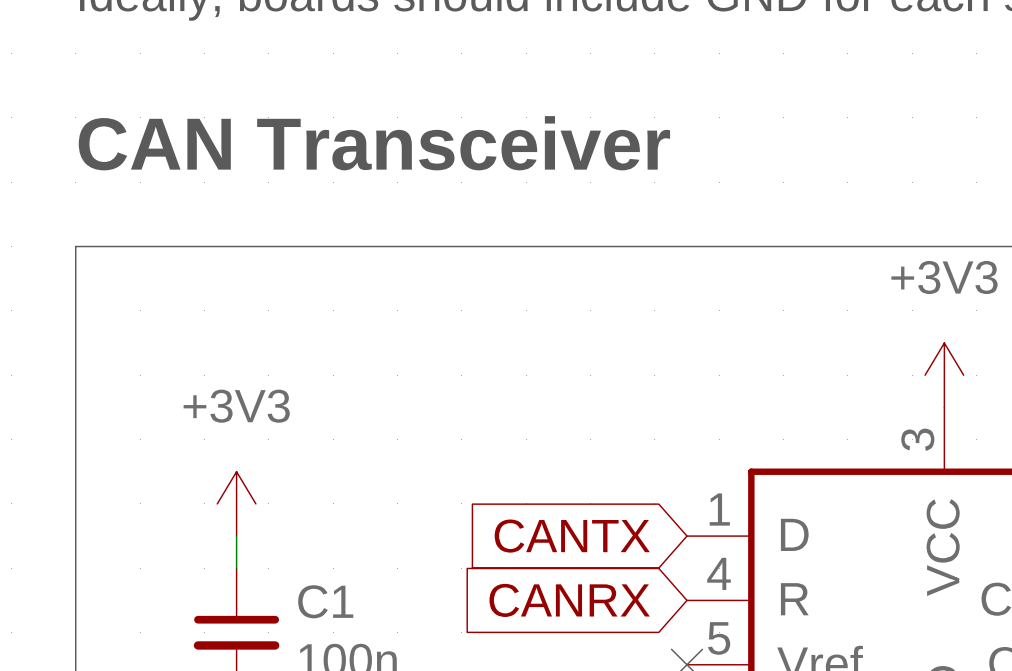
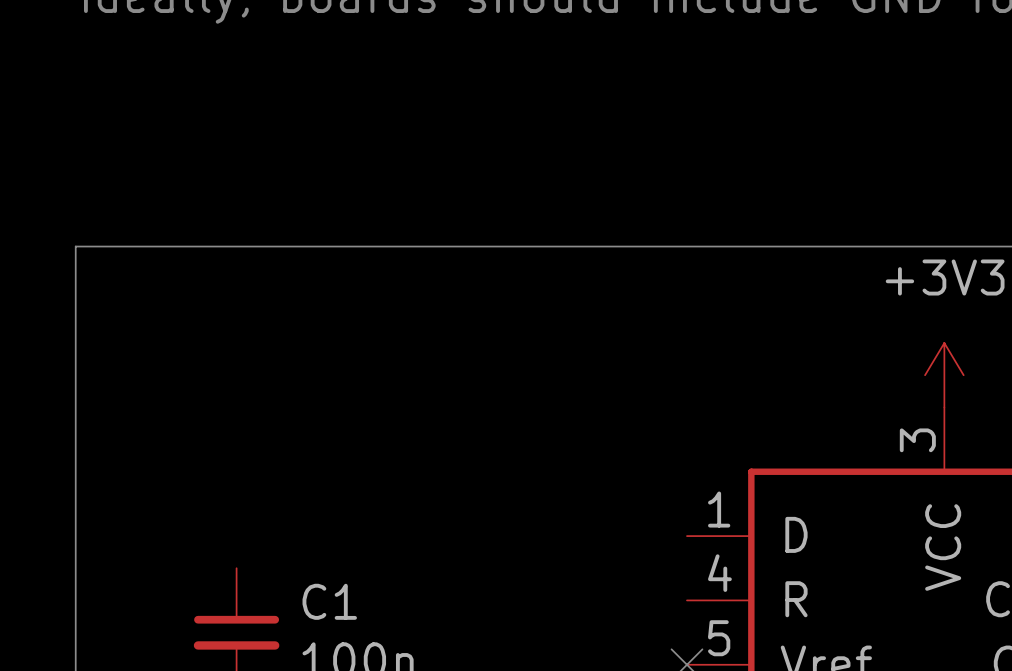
text: CAN Transceiver (374, 143) -> none
power symbol: +3V3 (236, 503) -> none
wire: (236, 536) (236, 568) -> none
global label: CANTX (572, 536) -> none
global label: CANRX (569, 600) -> none

